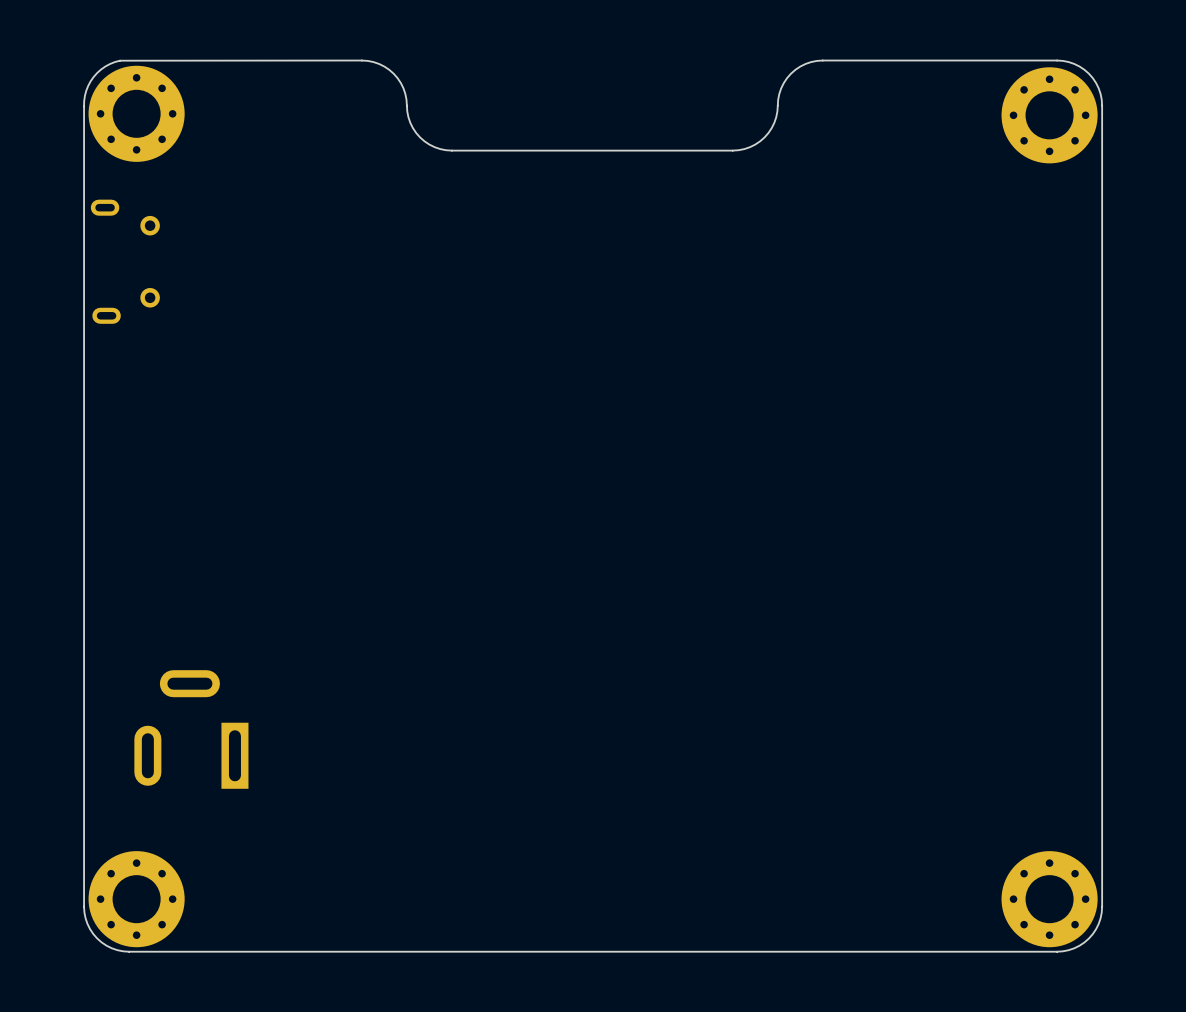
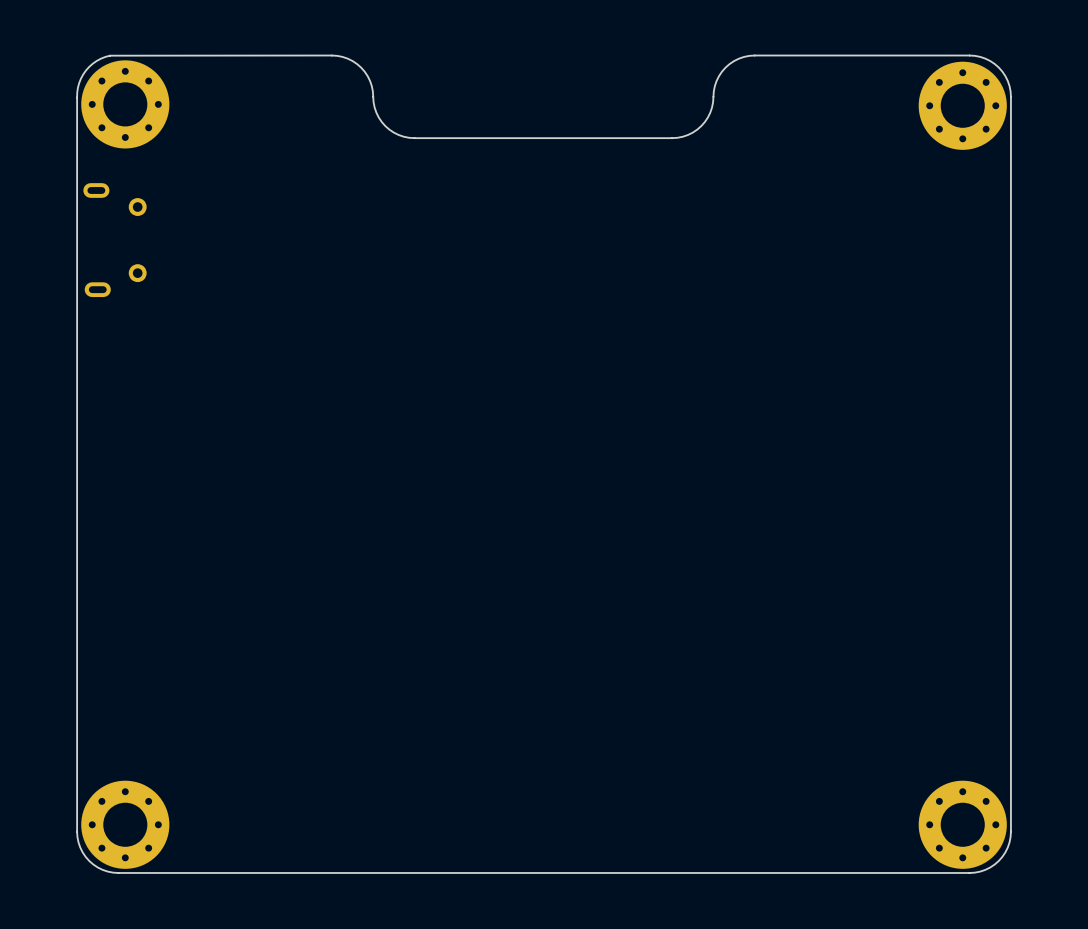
part: (191, 729) -> none

